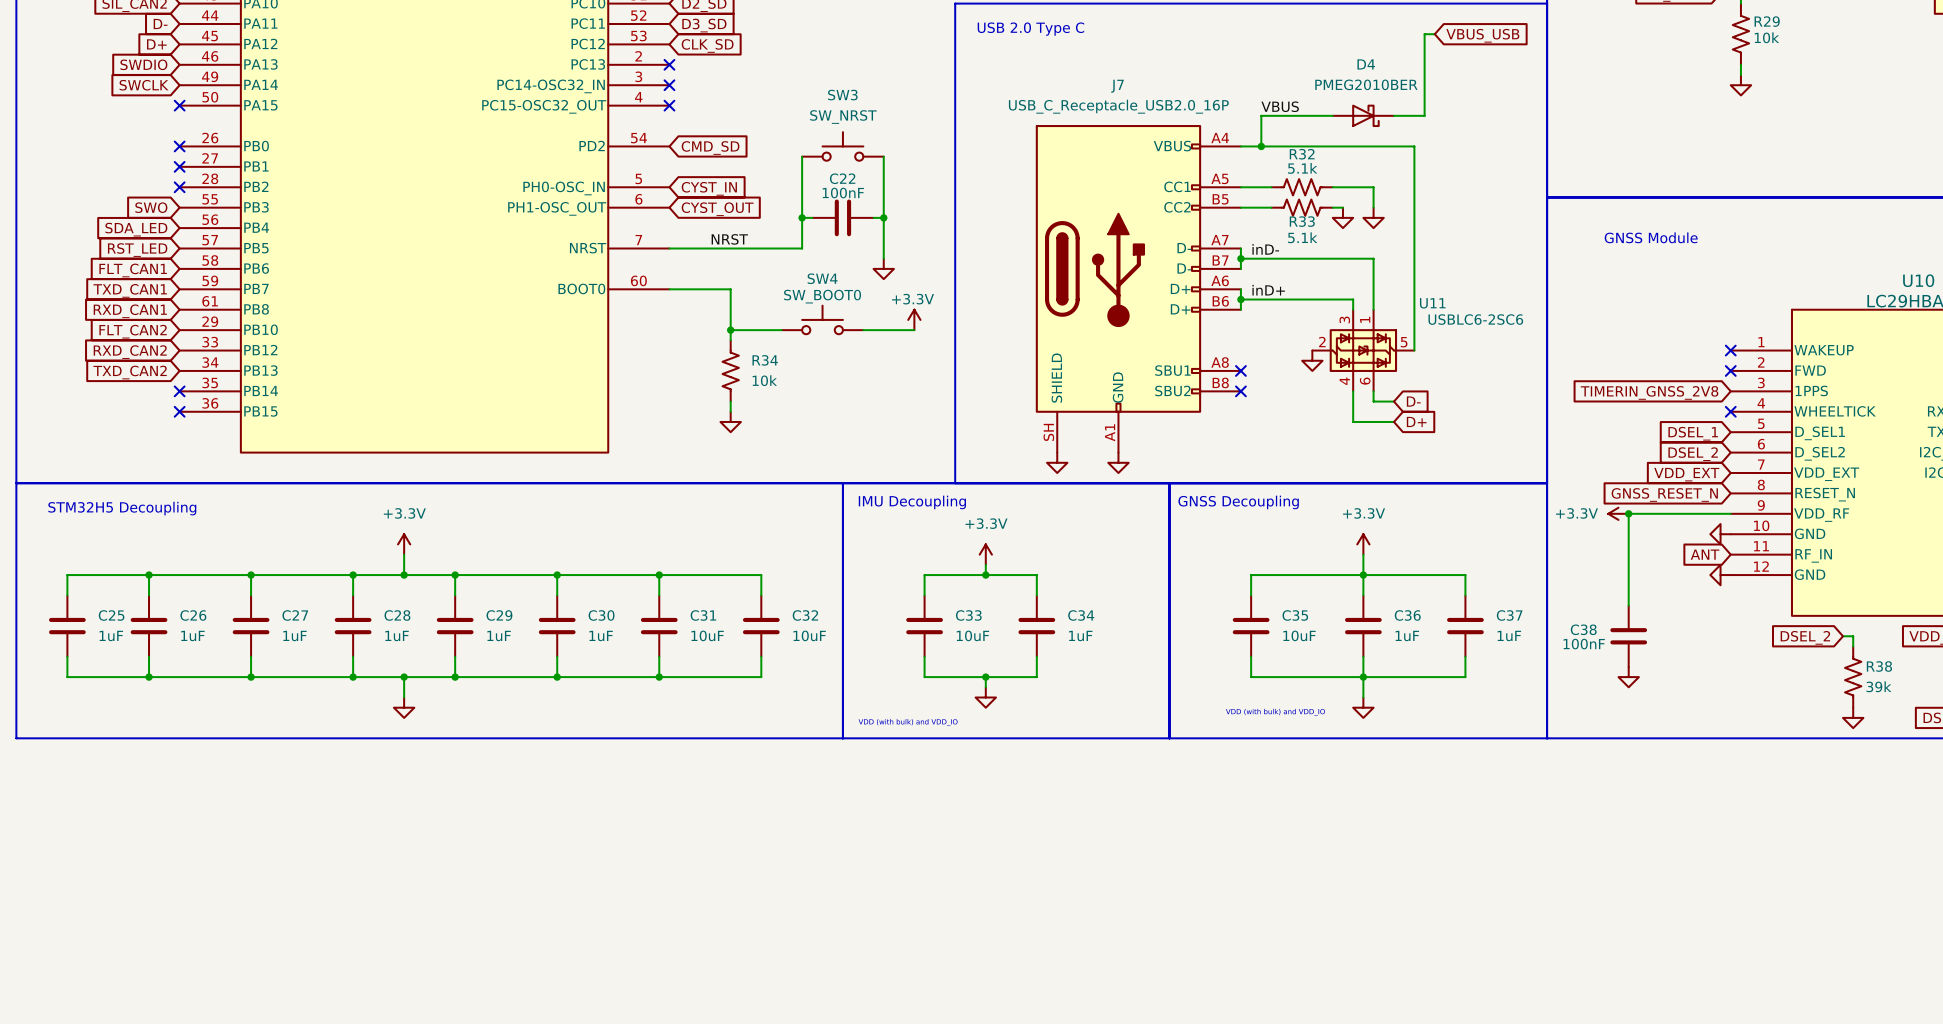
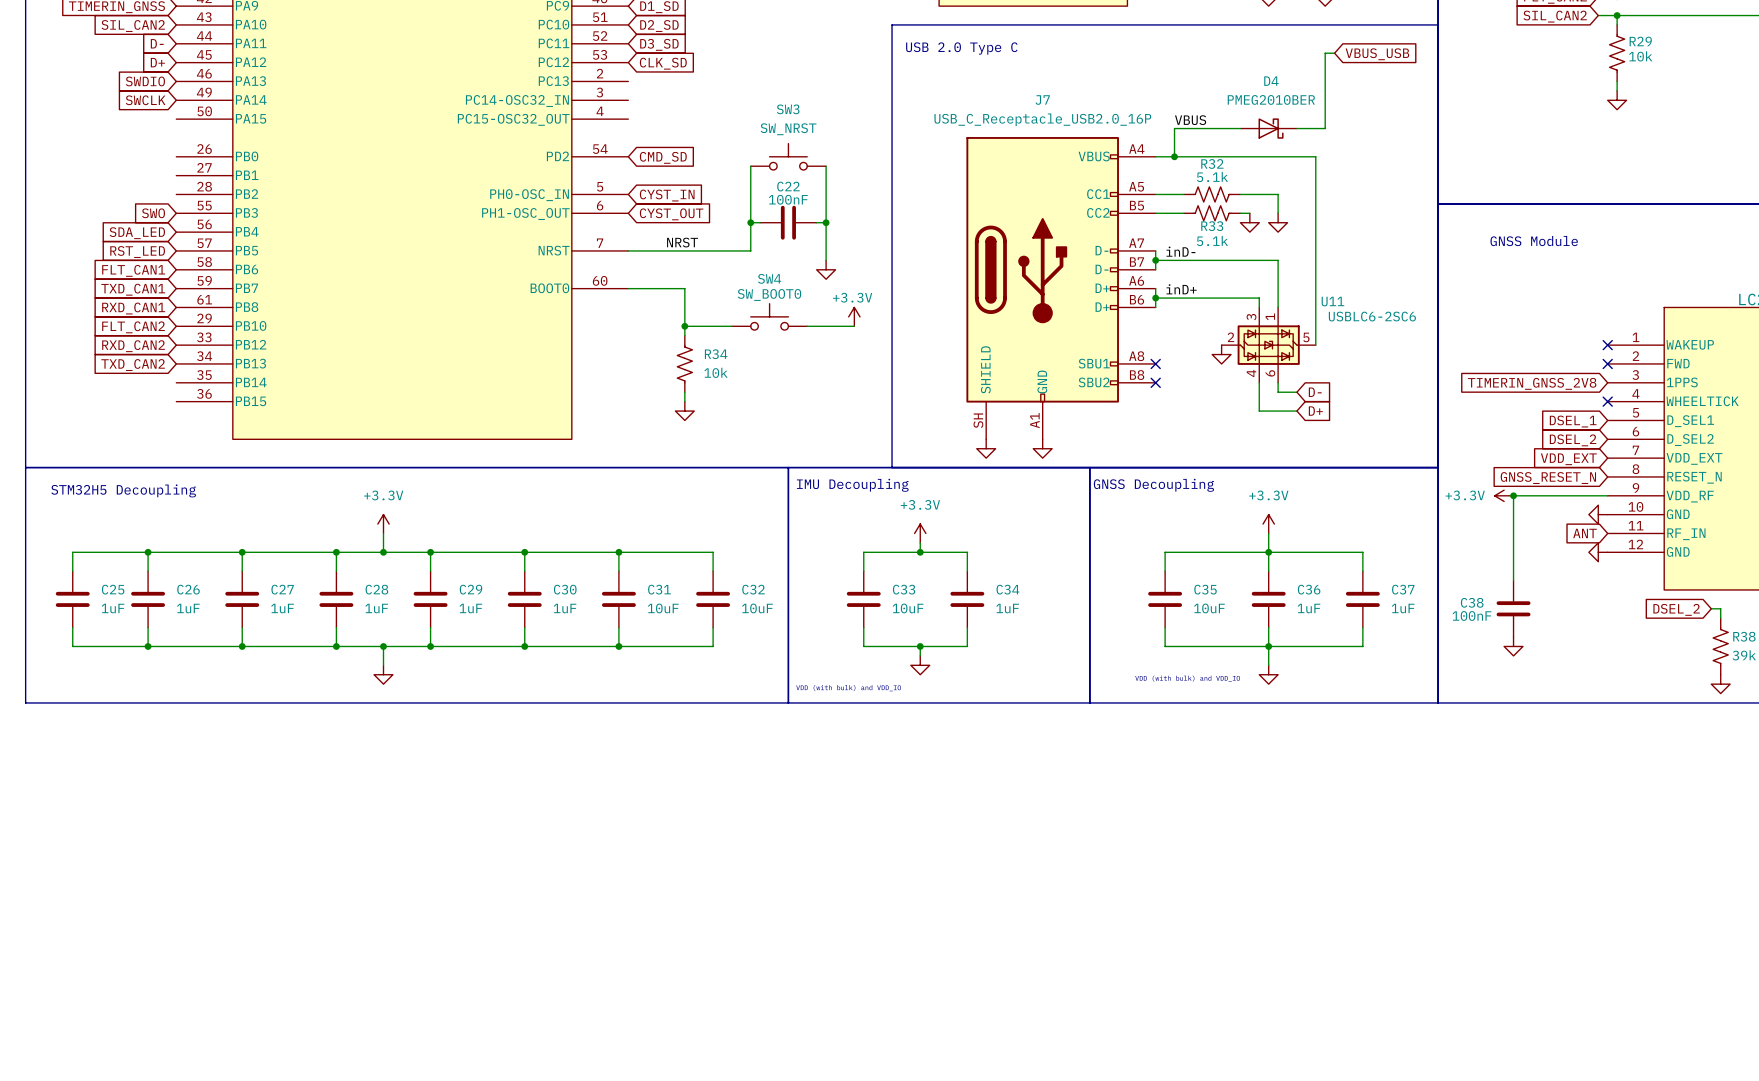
no-connect mark: (669, 64) -> none
no-connect mark: (669, 85) -> none
no-connect mark: (179, 105) -> none
no-connect mark: (669, 105) -> none
no-connect mark: (179, 146) -> none
no-connect mark: (179, 166) -> none
no-connect mark: (179, 187) -> none
no-connect mark: (179, 391) -> none
no-connect mark: (179, 411) -> none

